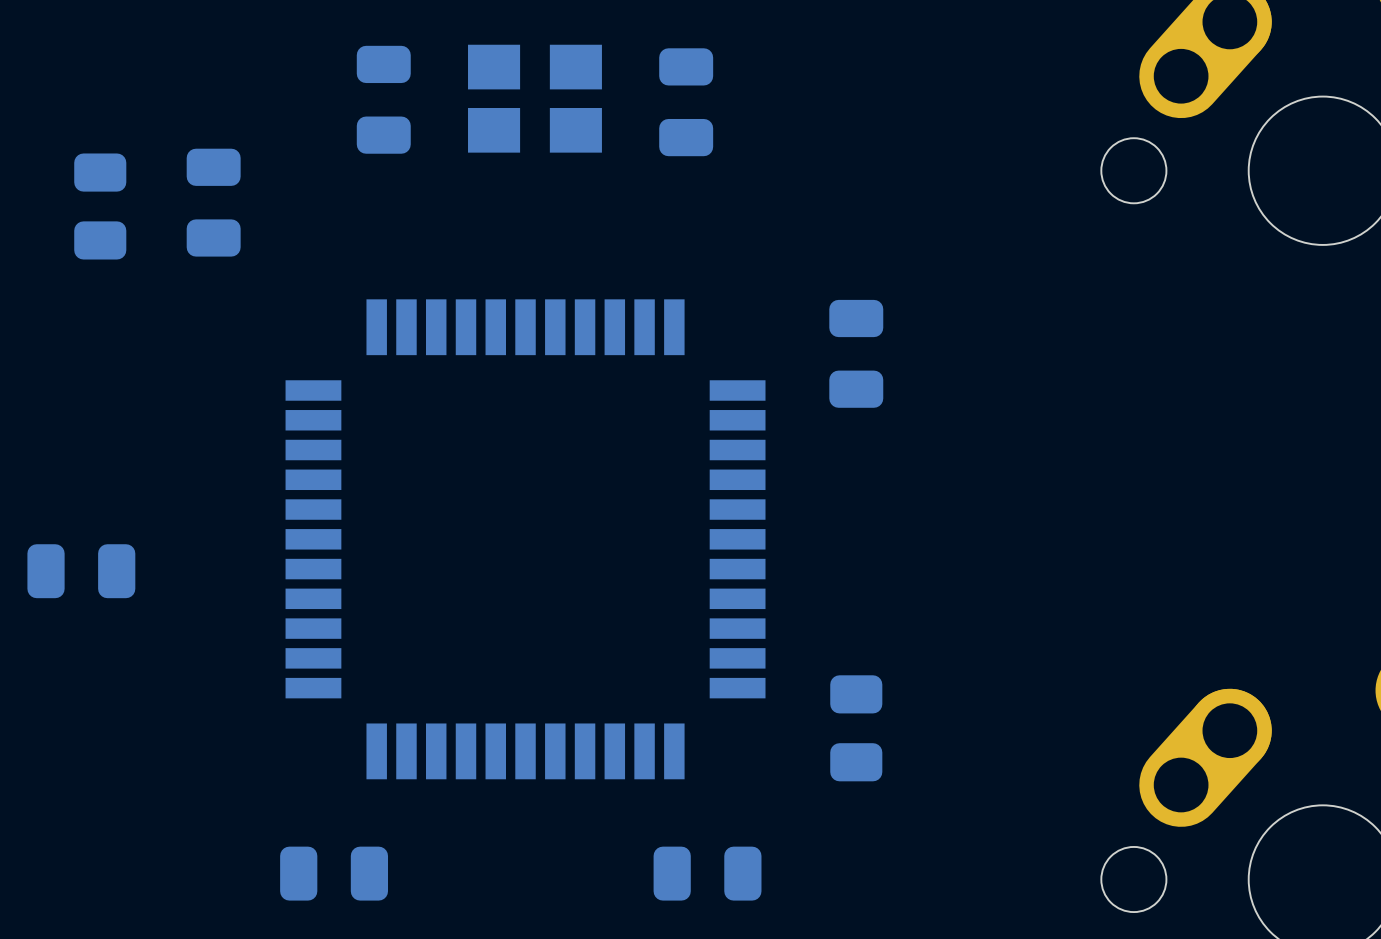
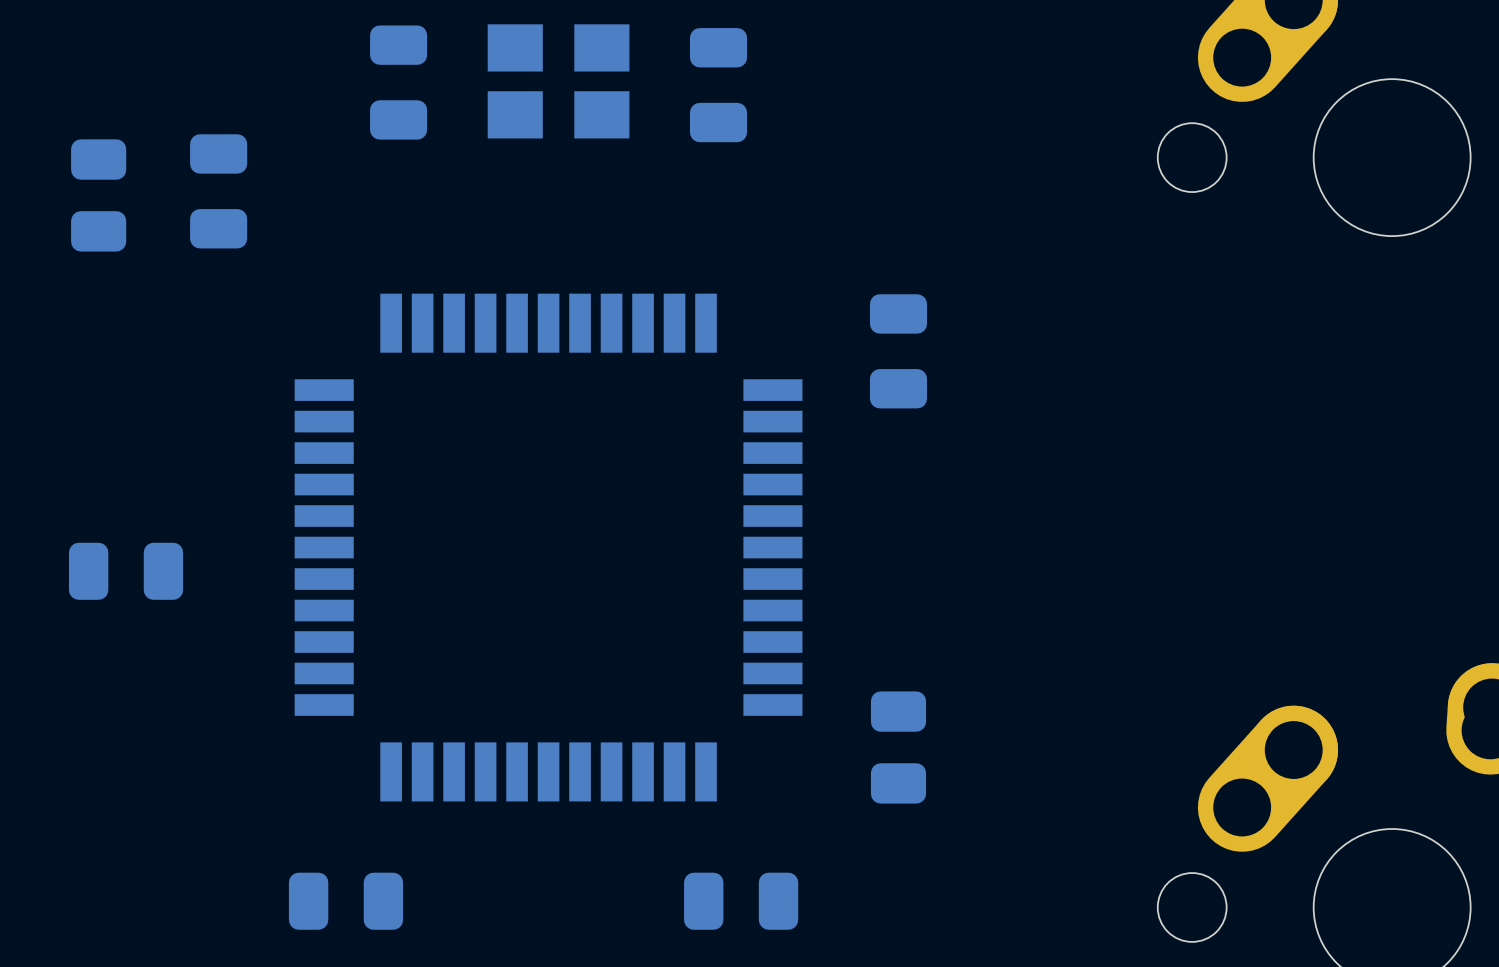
part position: (81, 571) -> (126, 571)

